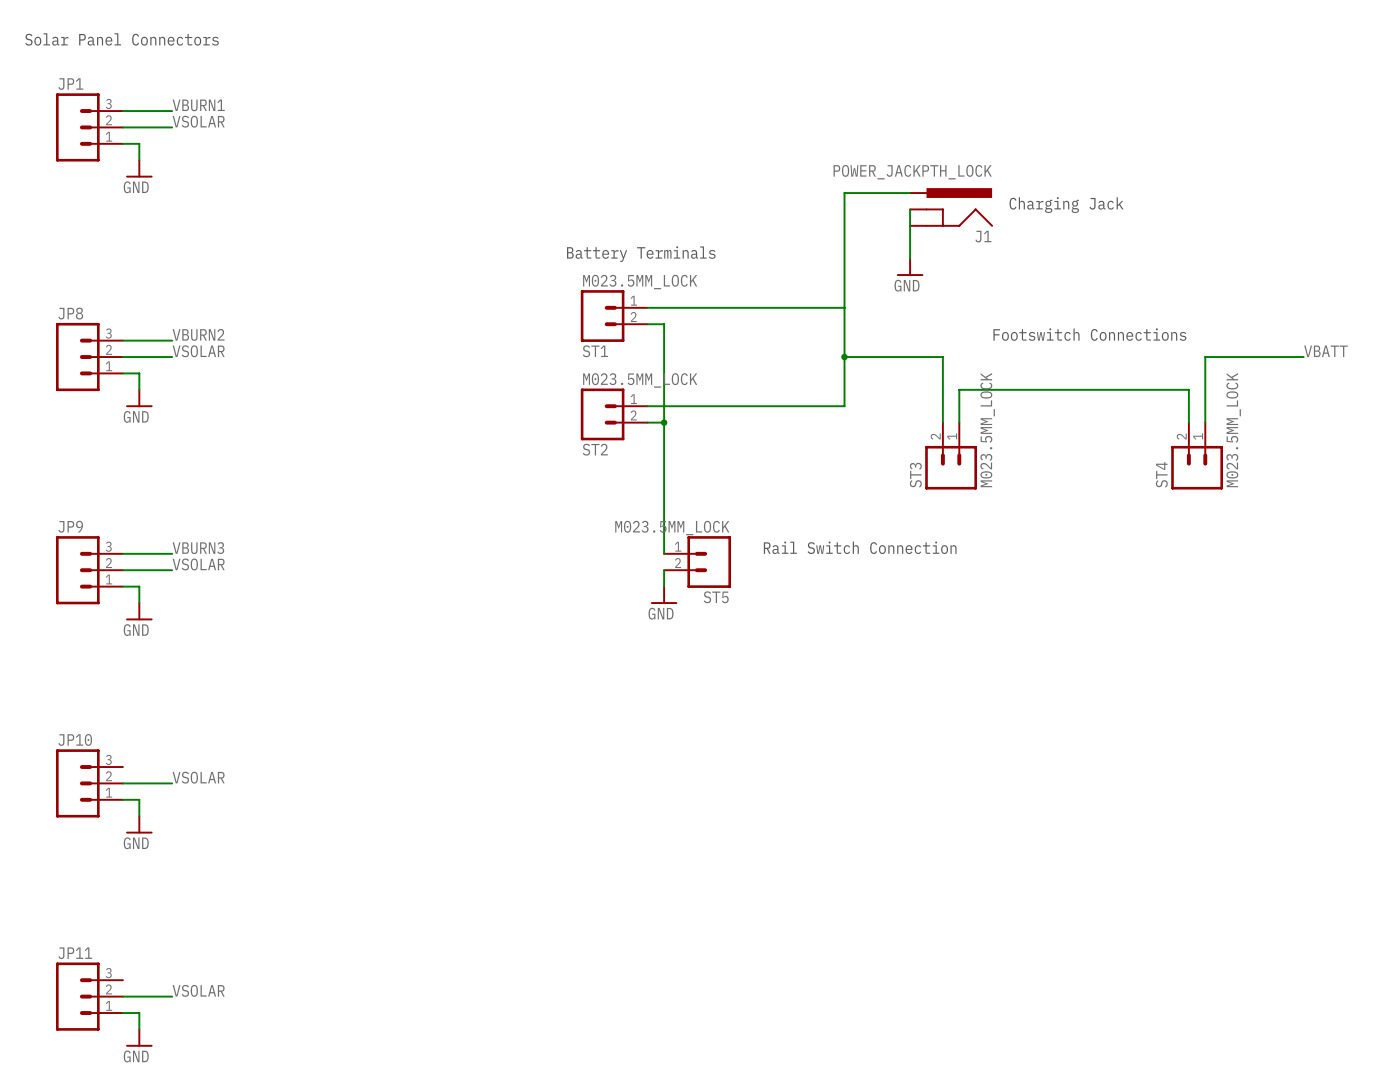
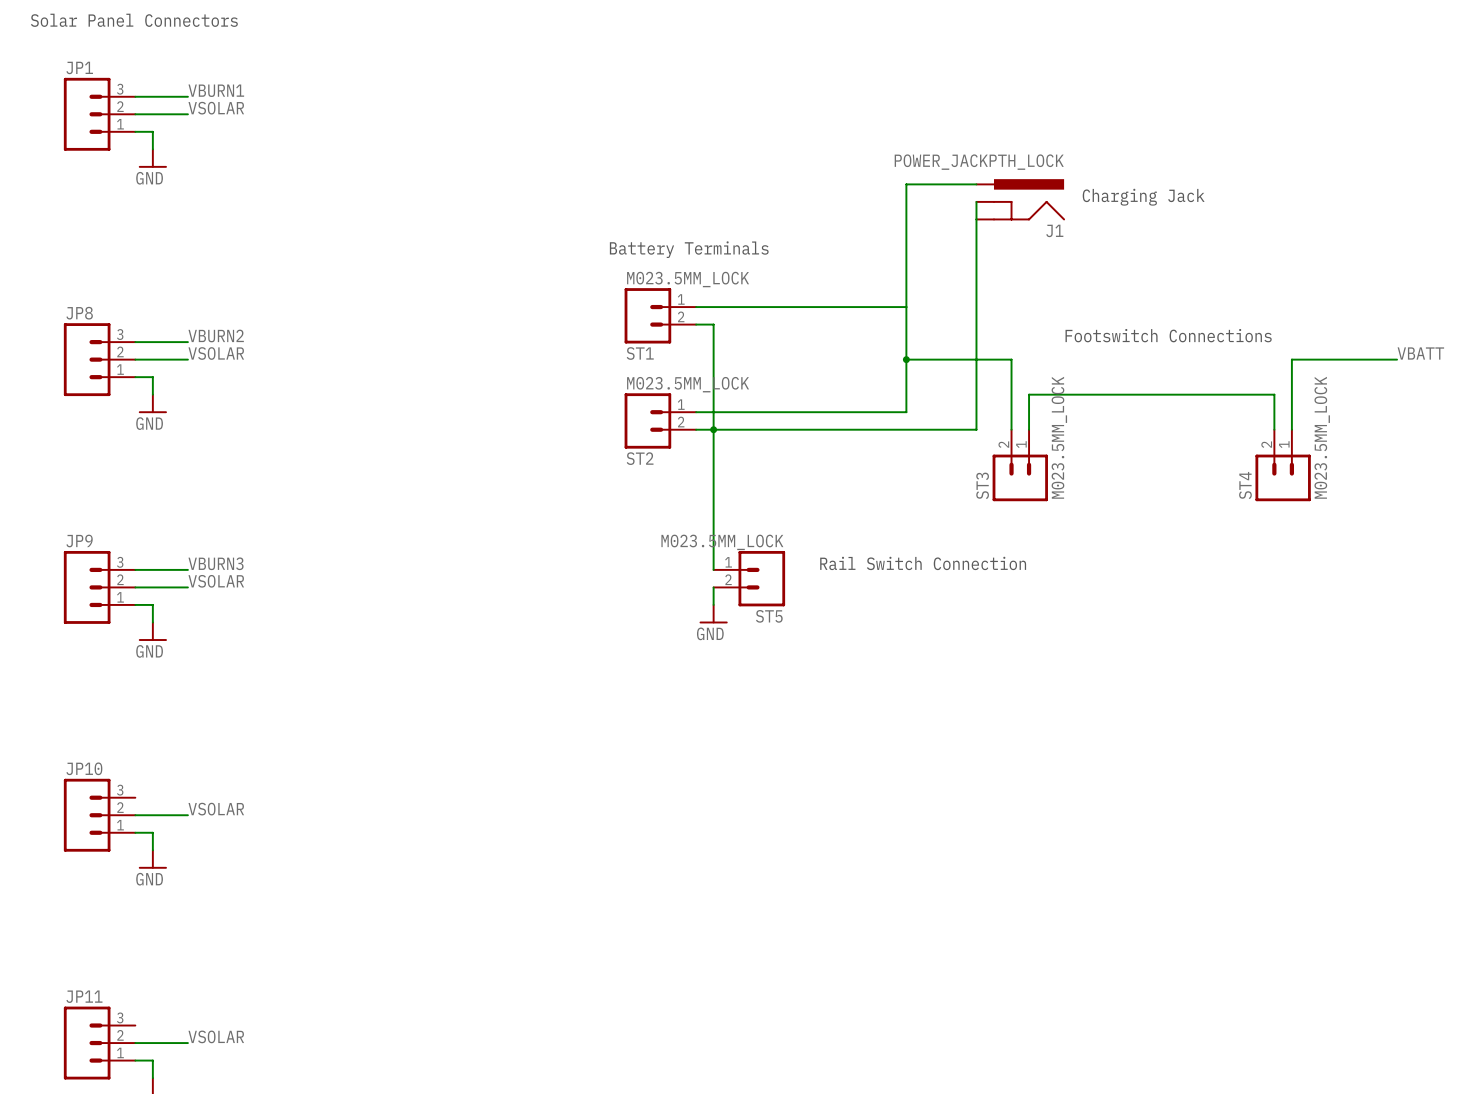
wire: none -> (976, 254) (976, 429) (713, 429)
power symbol: GND (910, 267) -> none

